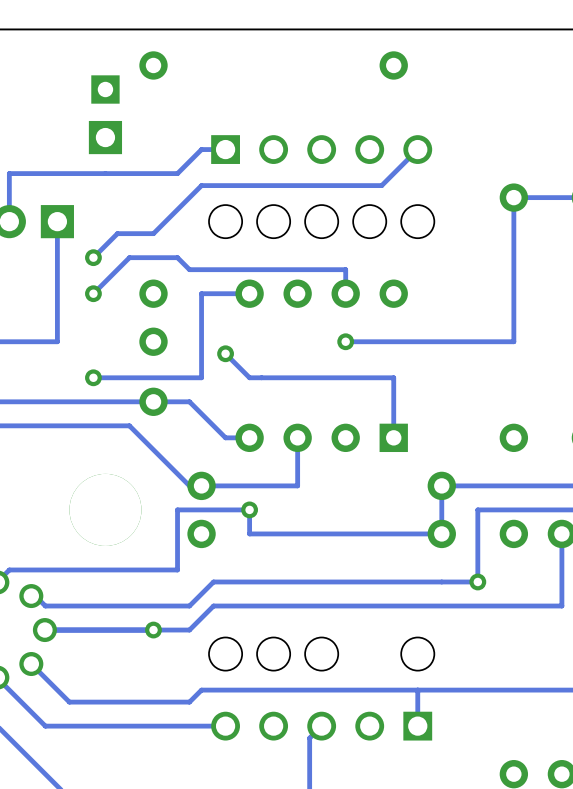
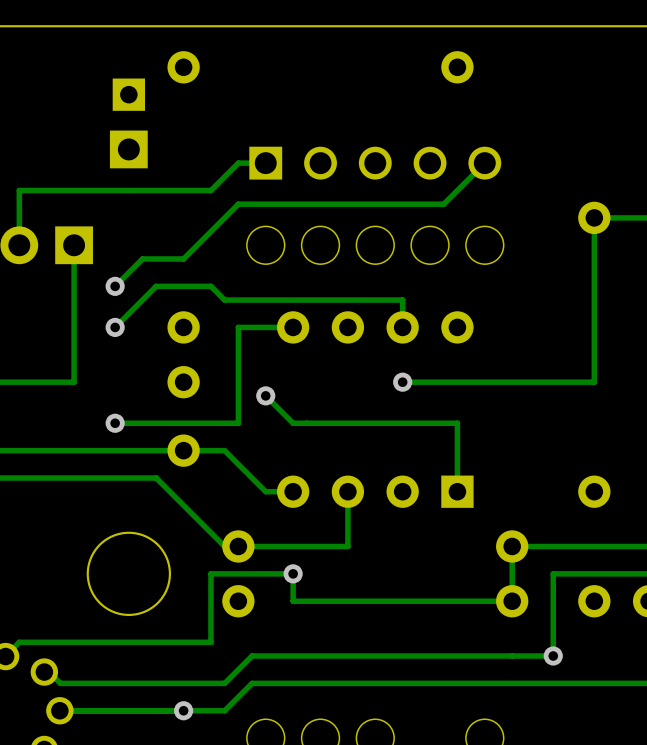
round board edge: none -> [86, 531, 171, 617]

